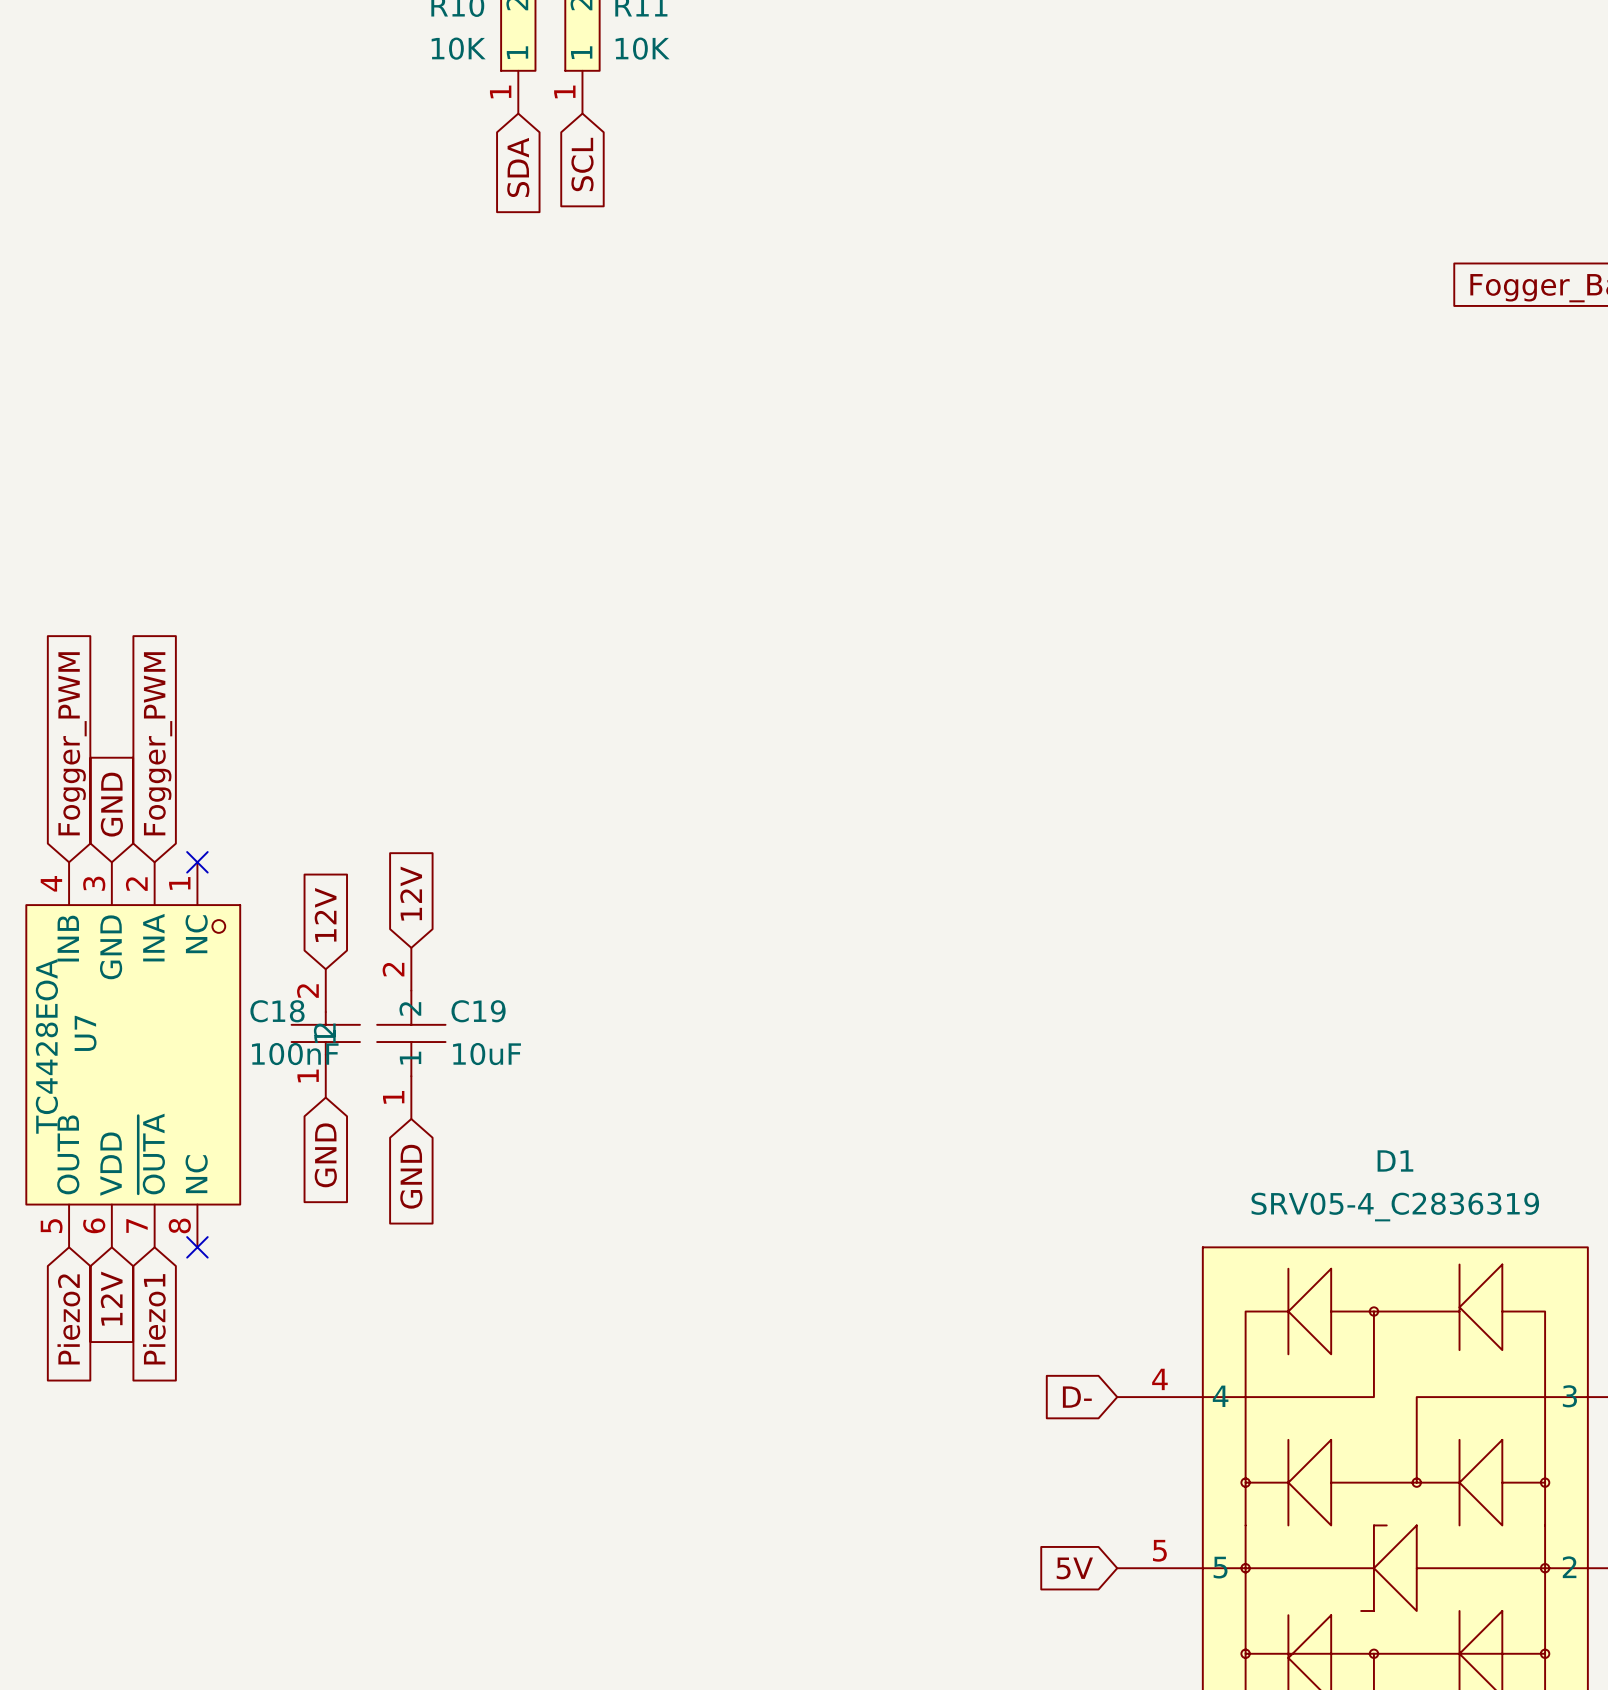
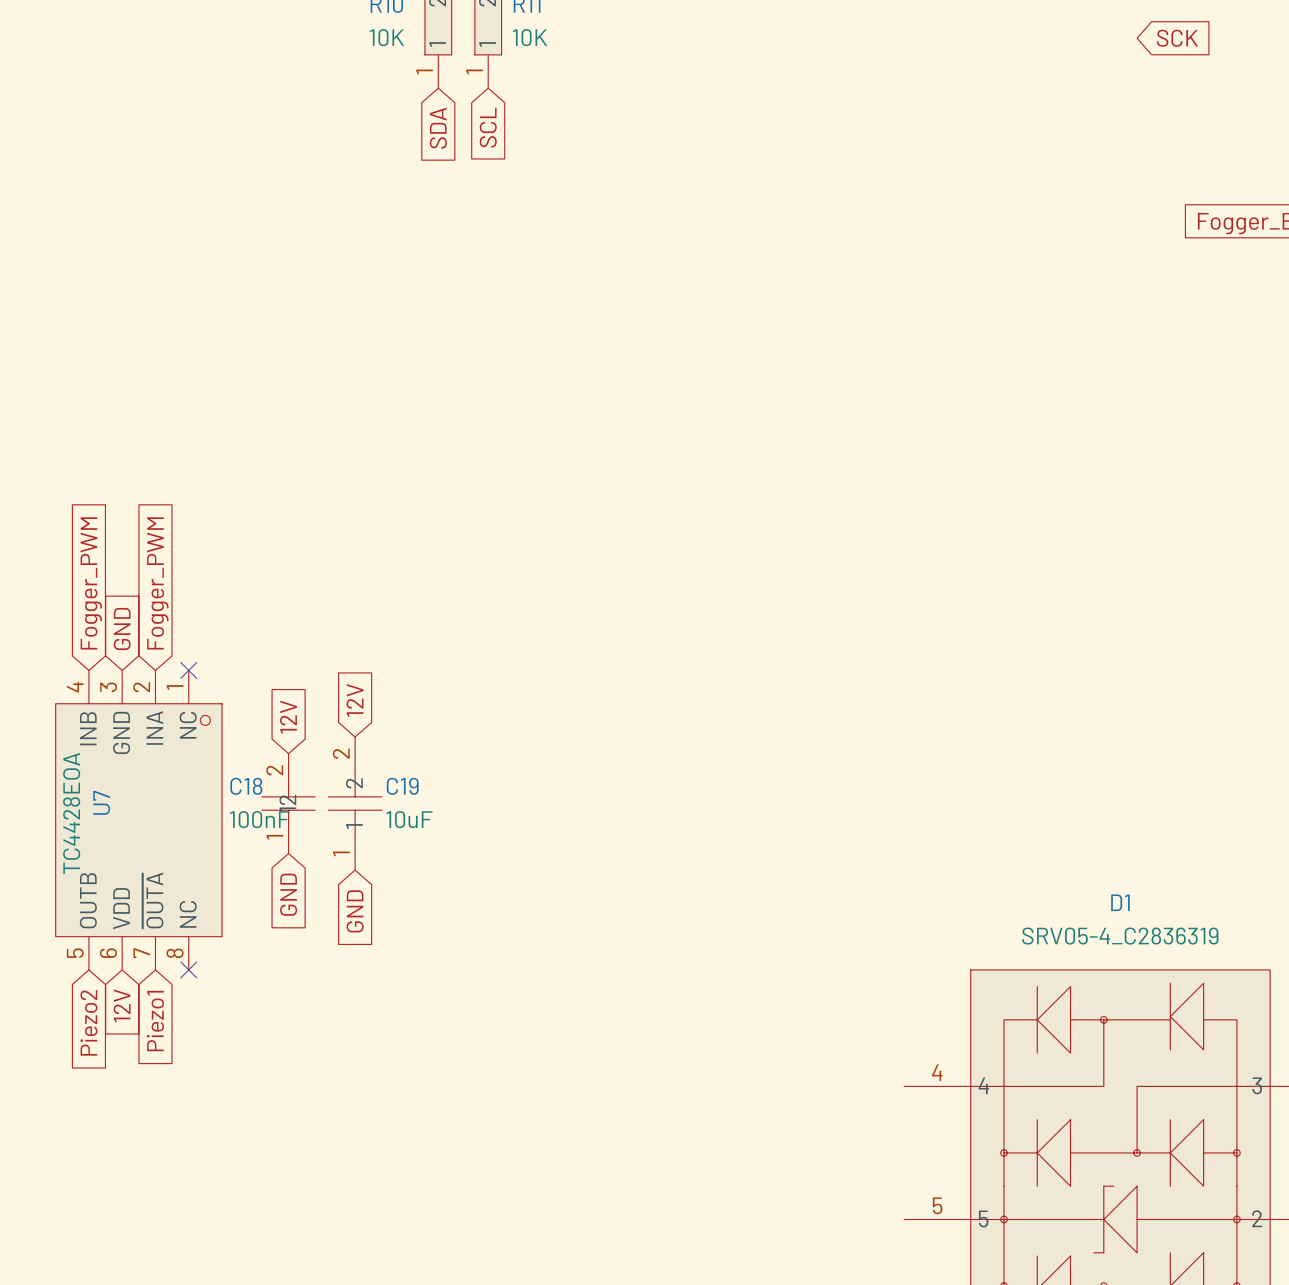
global label: none -> SCK (1177, 38)
global label: D- (1077, 1397) -> none
global label: 5V (1074, 1568) -> none

